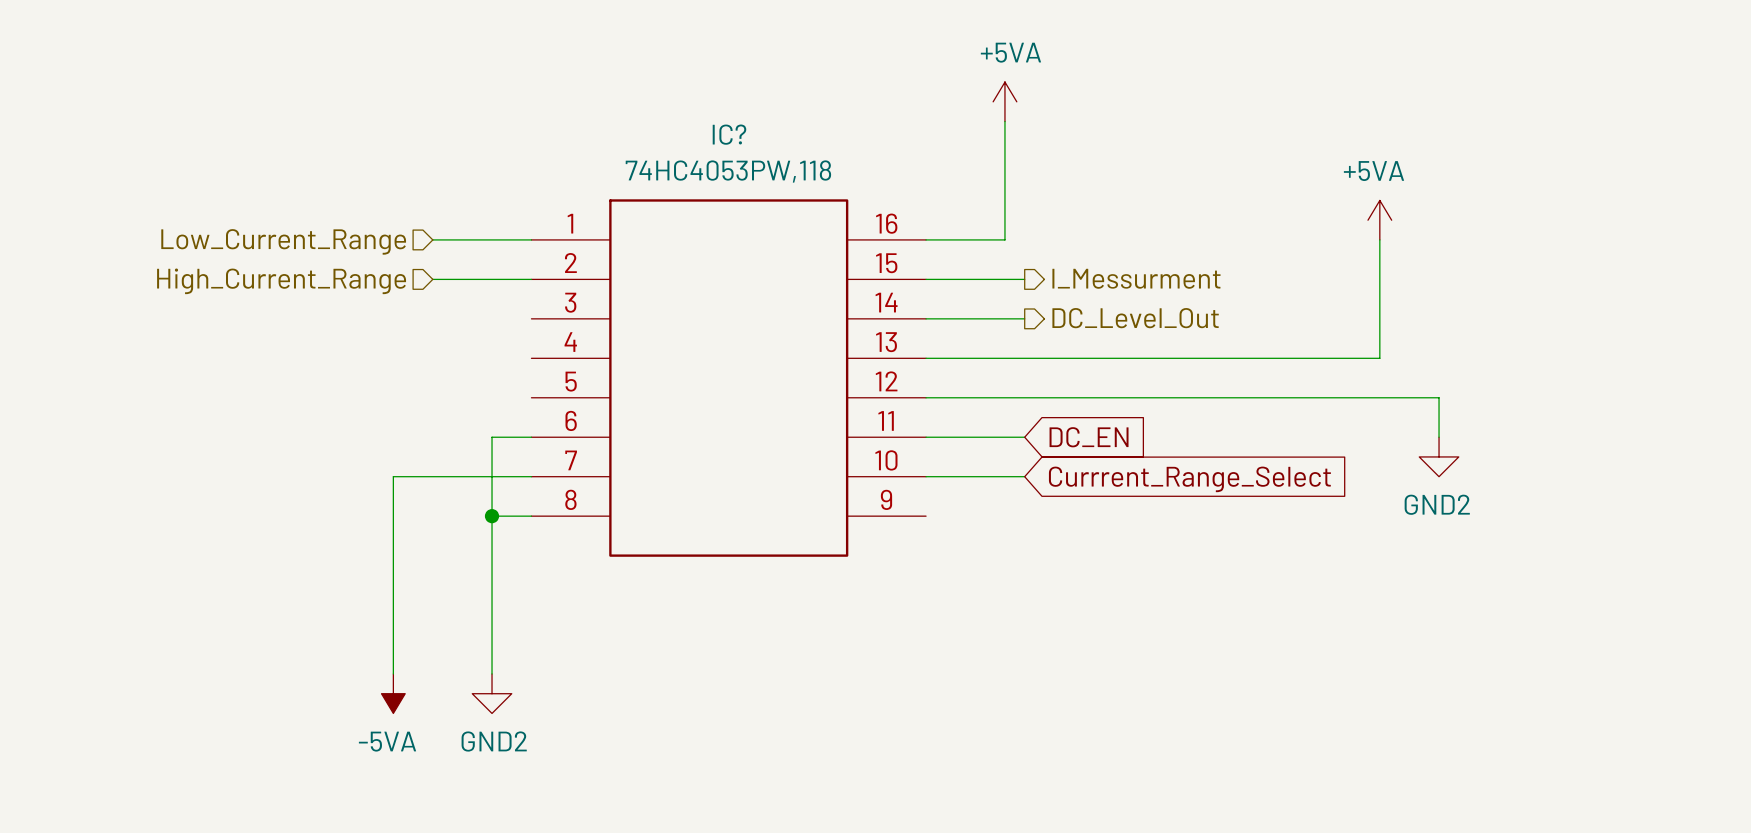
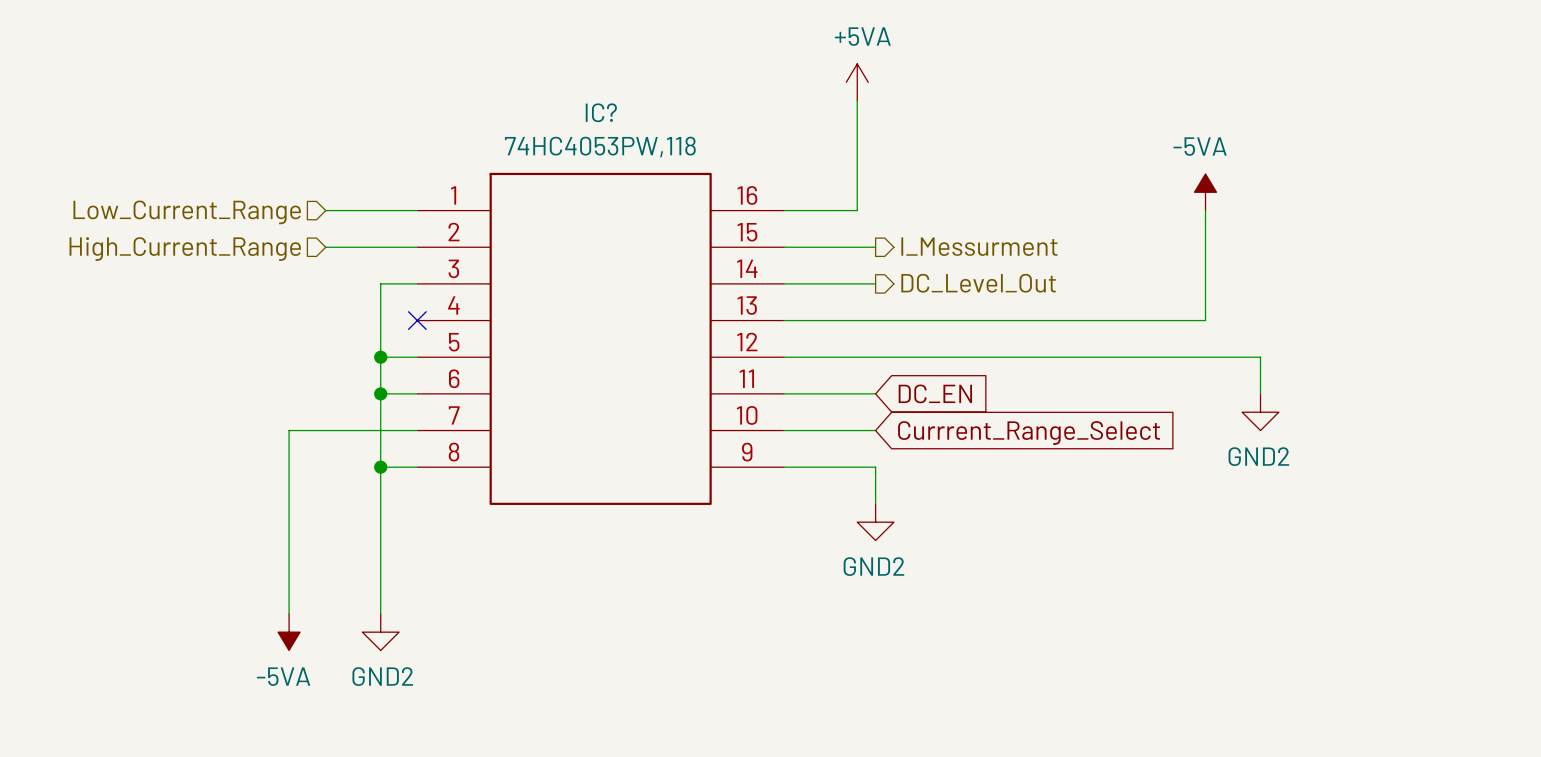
power symbol: +5VA (1379, 220) -> -5VA (1205, 192)
wire: none -> (417, 283) (380, 283) (380, 393)
no-connect mark: none -> (417, 320)
wire: none -> (380, 357) (417, 357)
junction: none -> (380, 357)
junction: none -> (380, 393)
wire: none -> (783, 467) (875, 467) (875, 503)
power symbol: none -> GND2 (875, 522)

